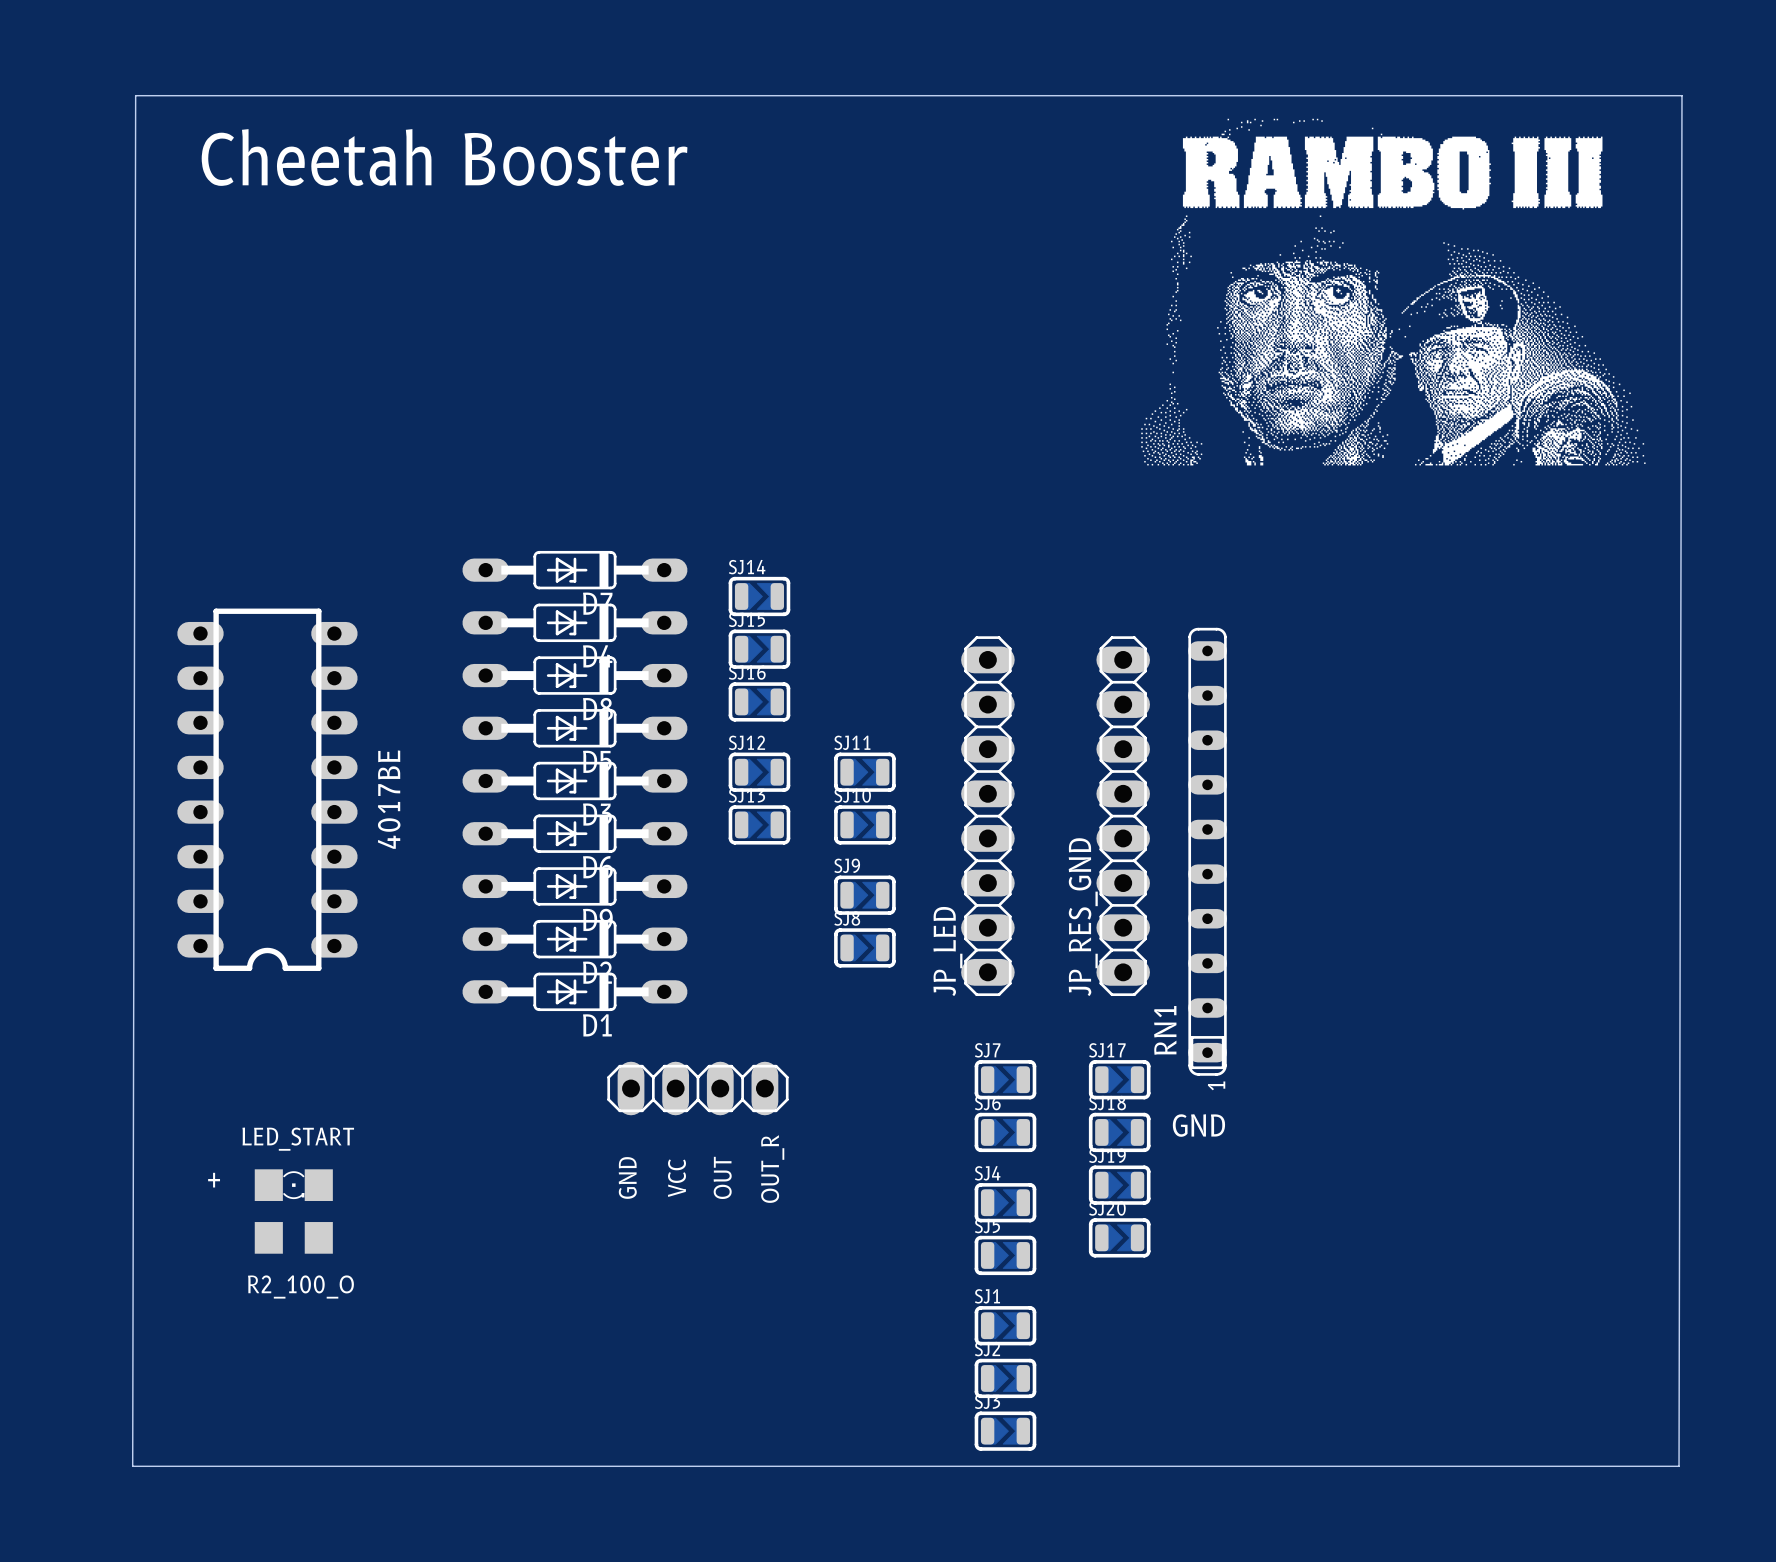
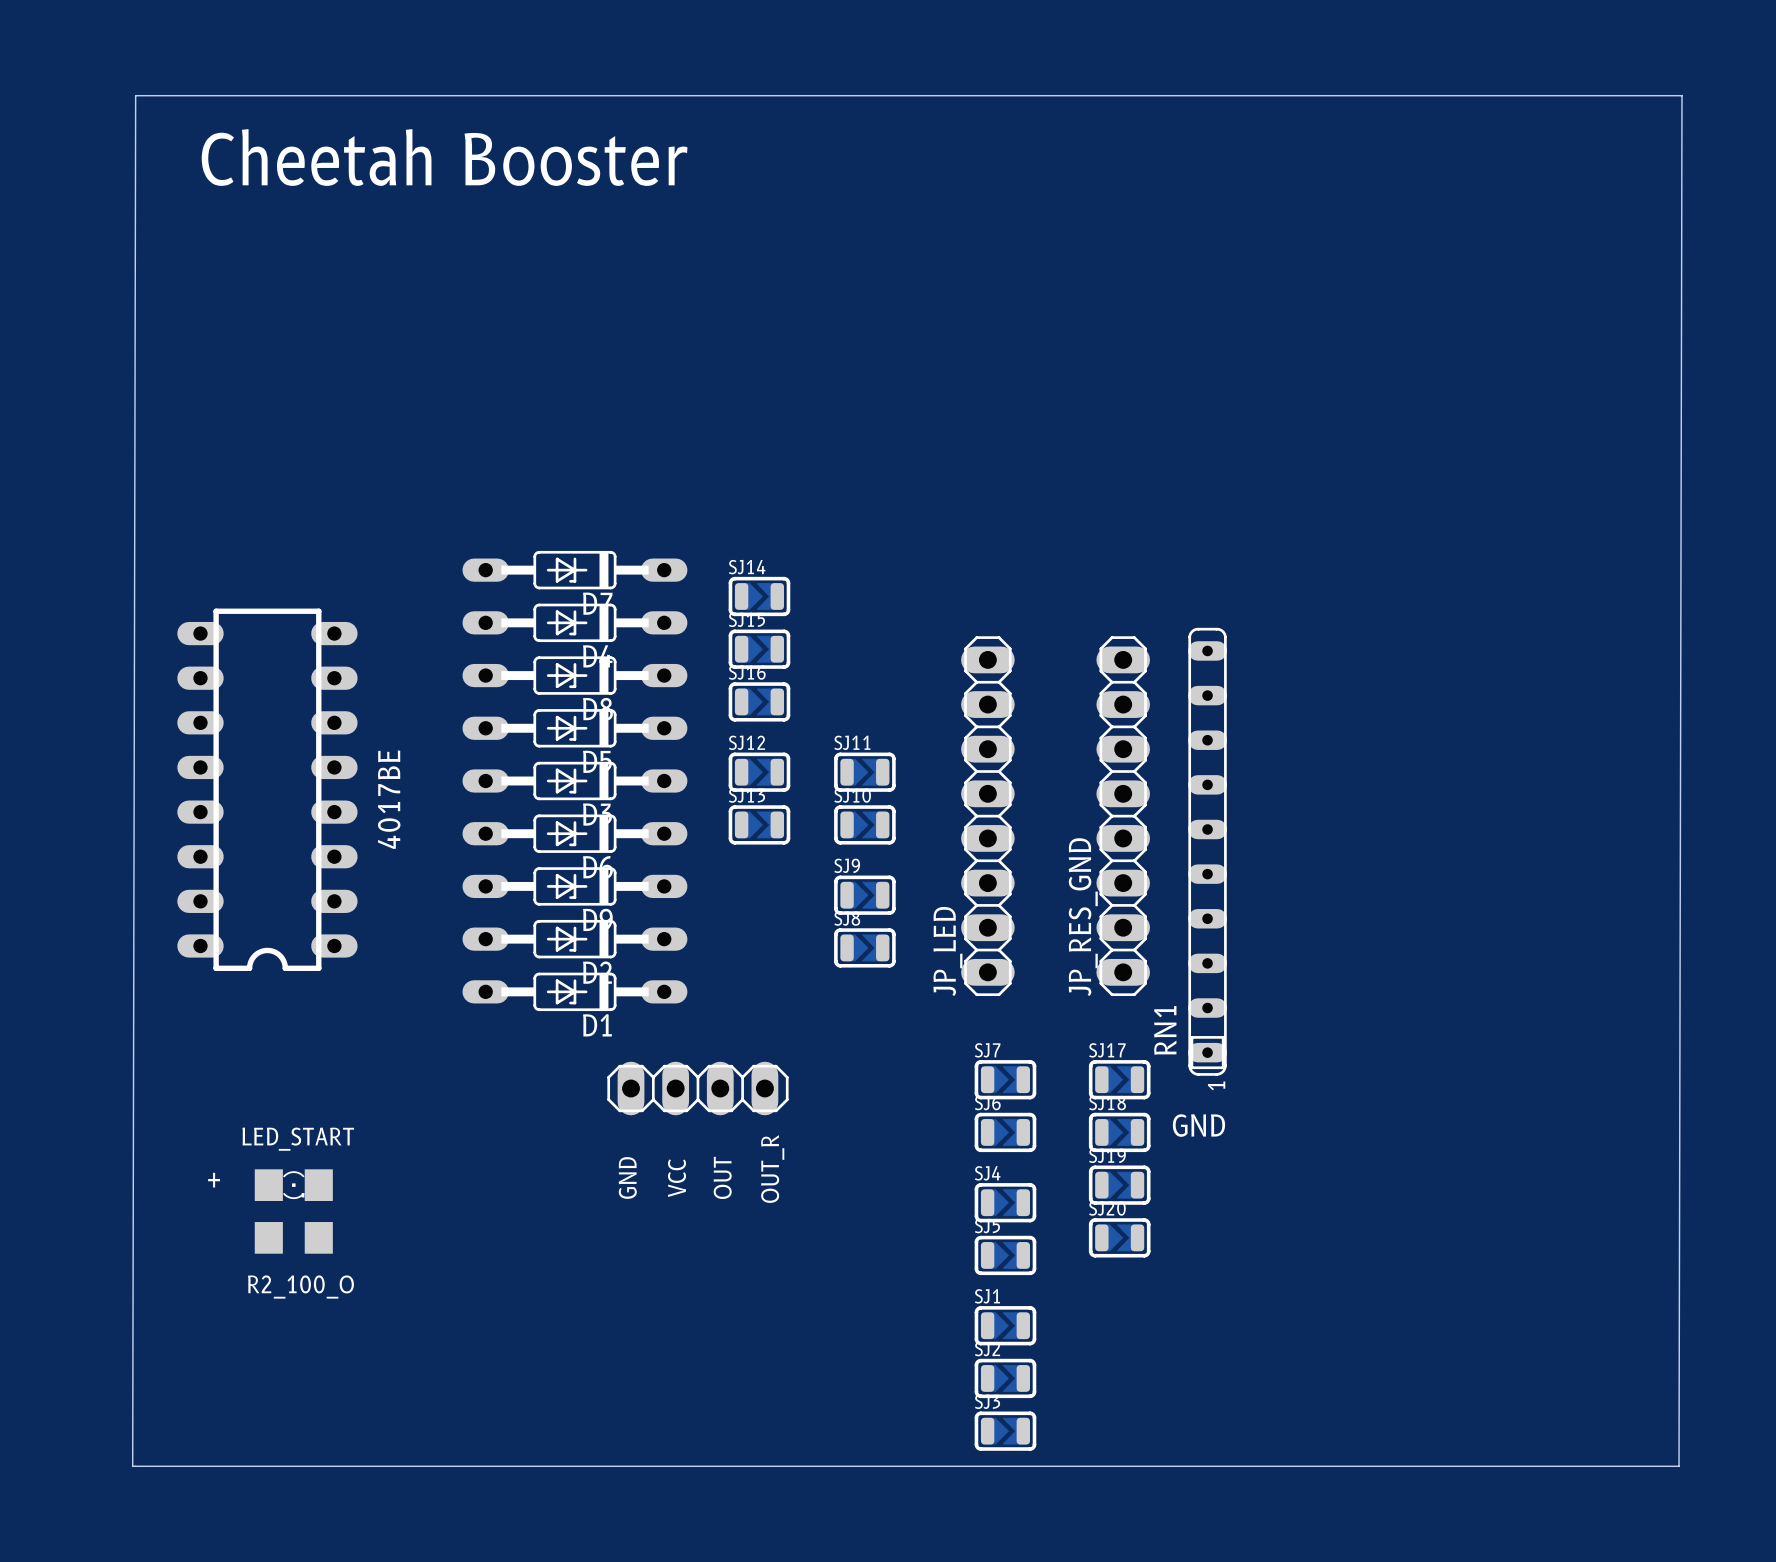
drawing: [1141, 118, 1646, 466] -> none
drawing: [1511, 136, 1603, 209] -> none

